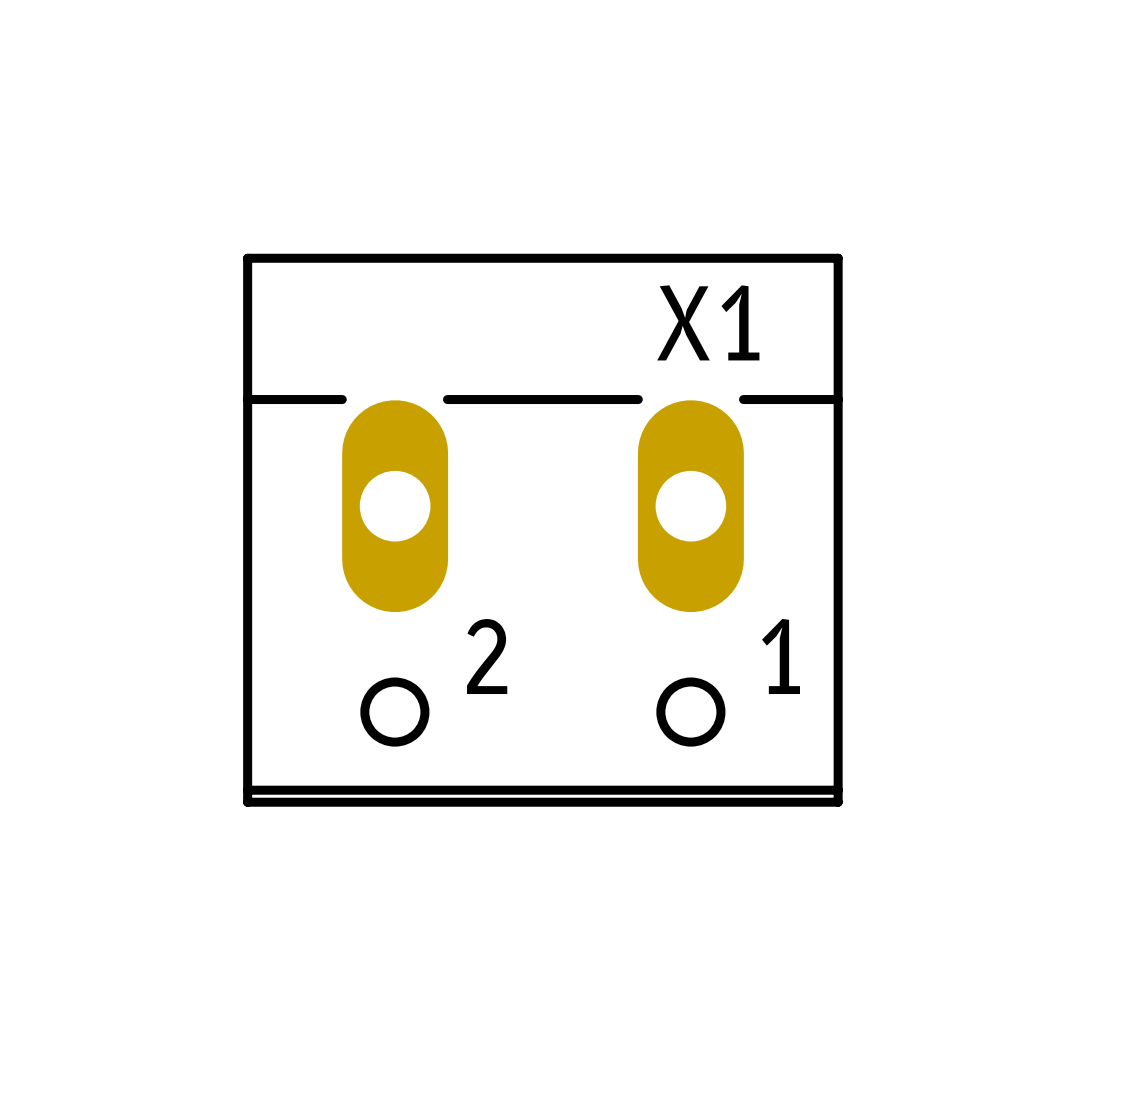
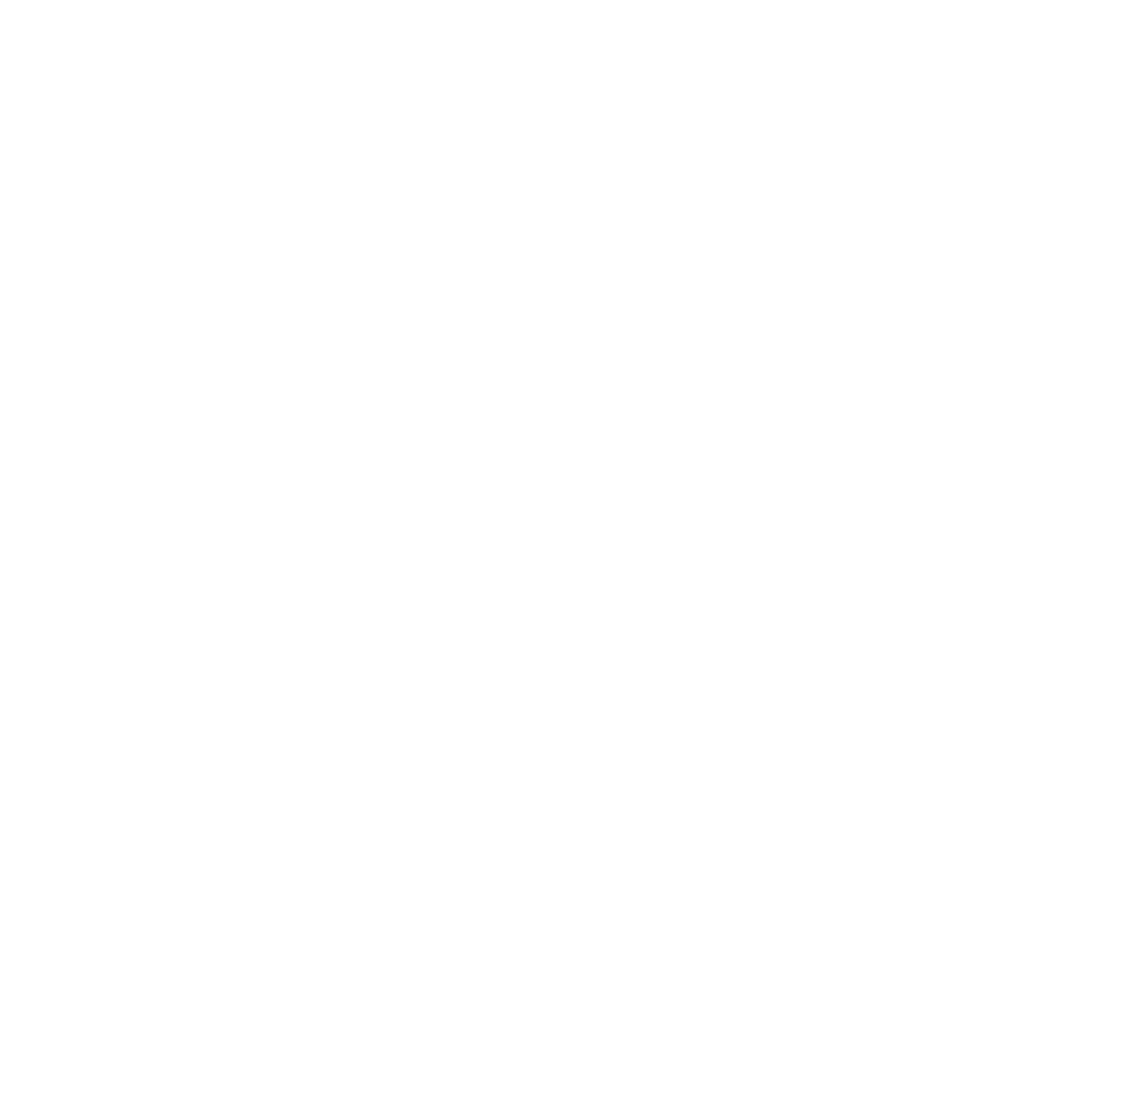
X1: (542, 530) -> none

